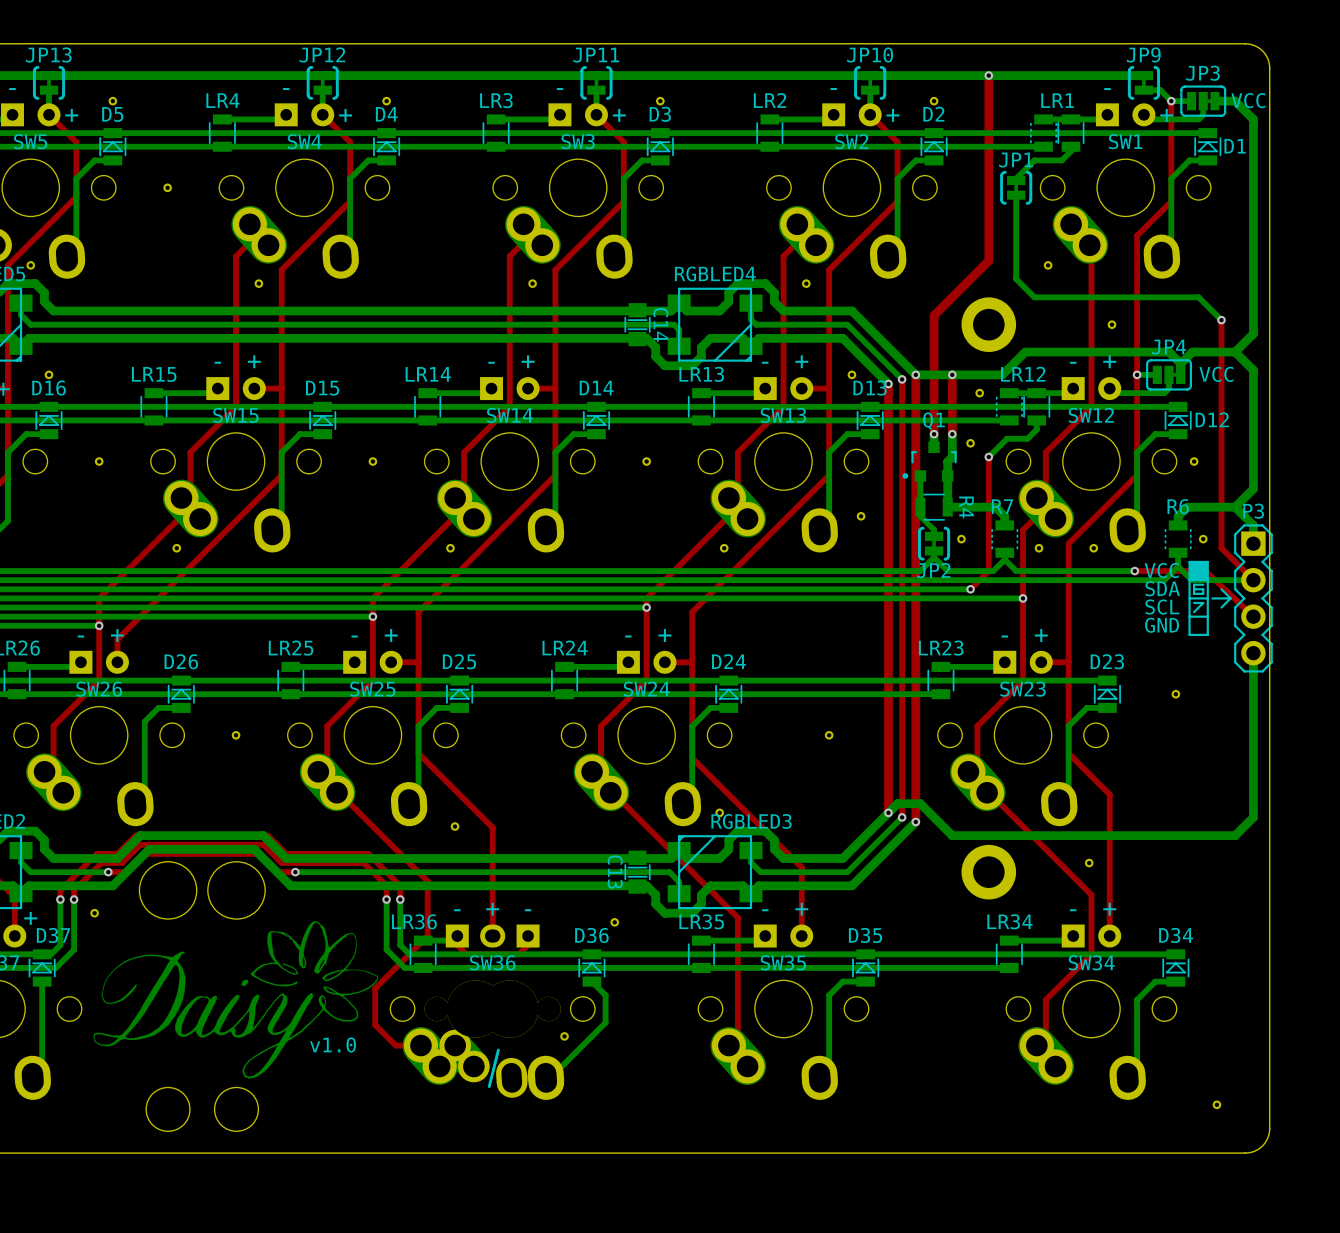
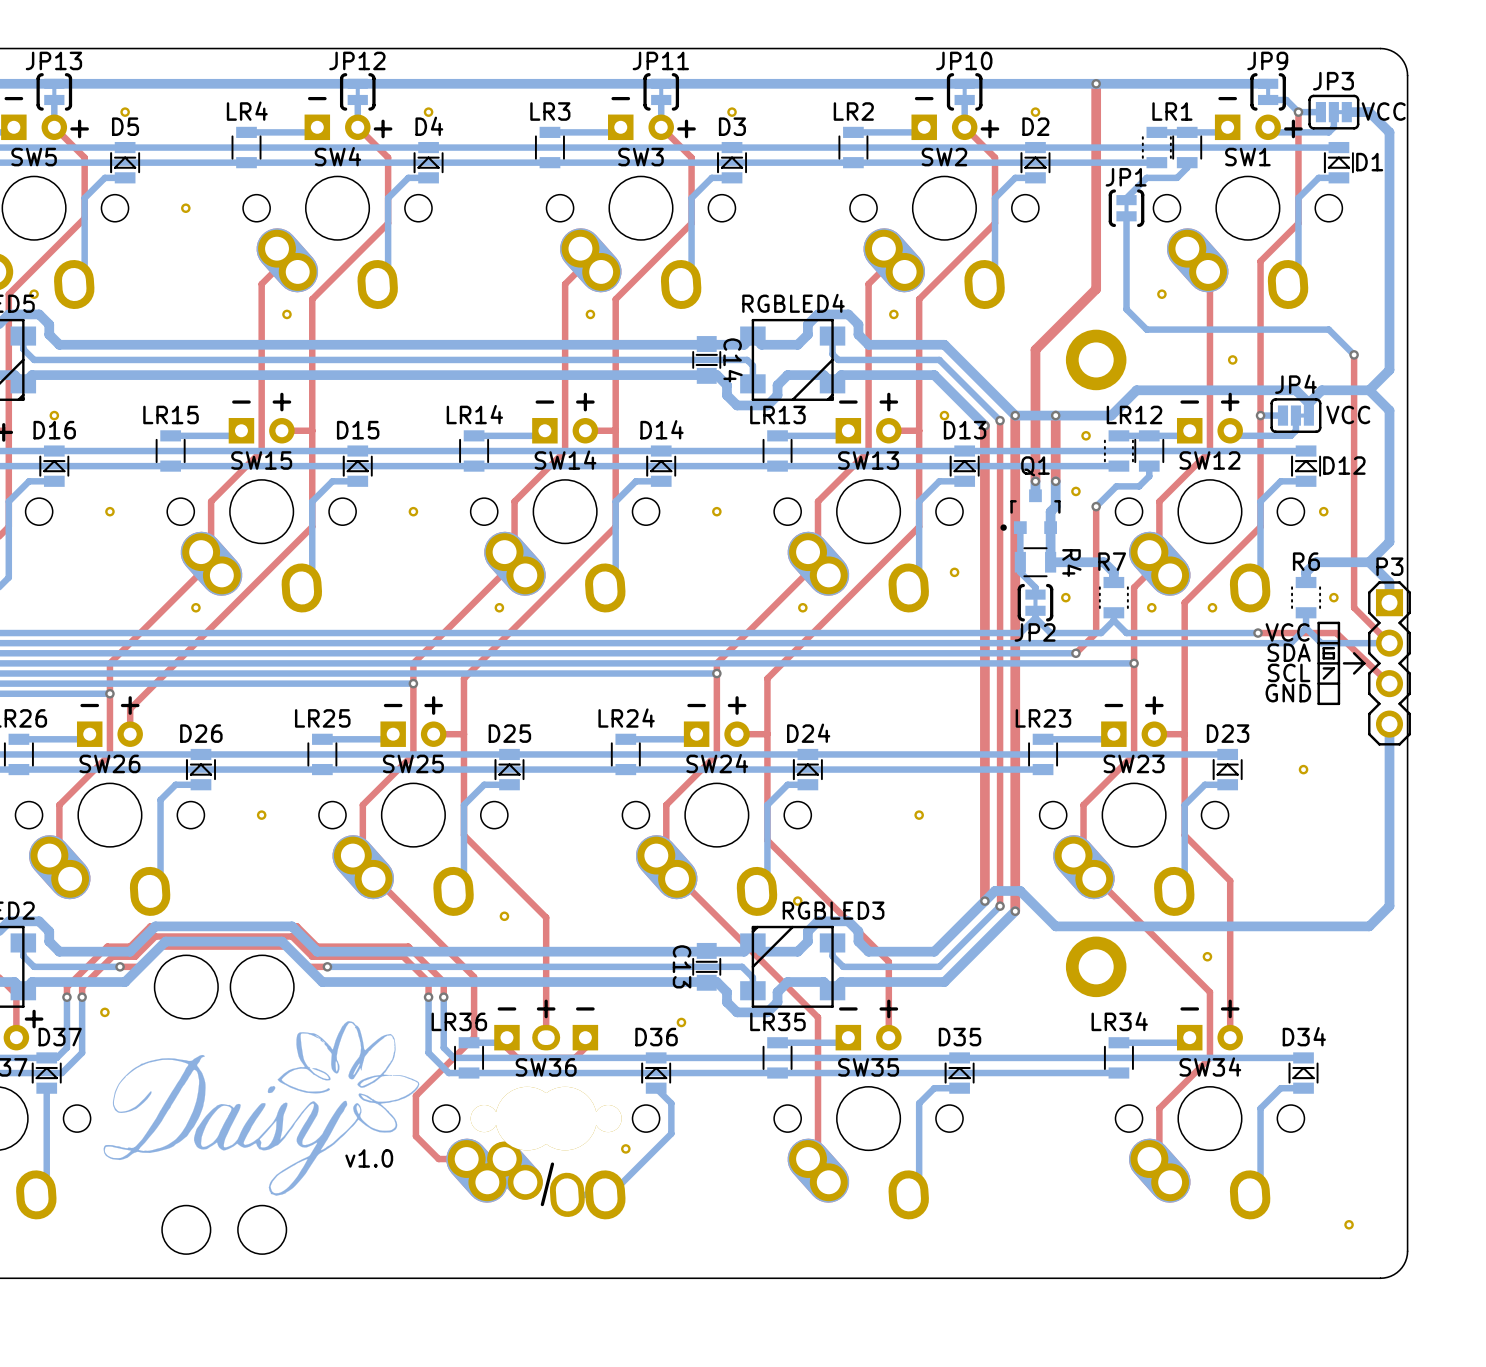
drawing: [1189, 561, 1208, 581] -> none

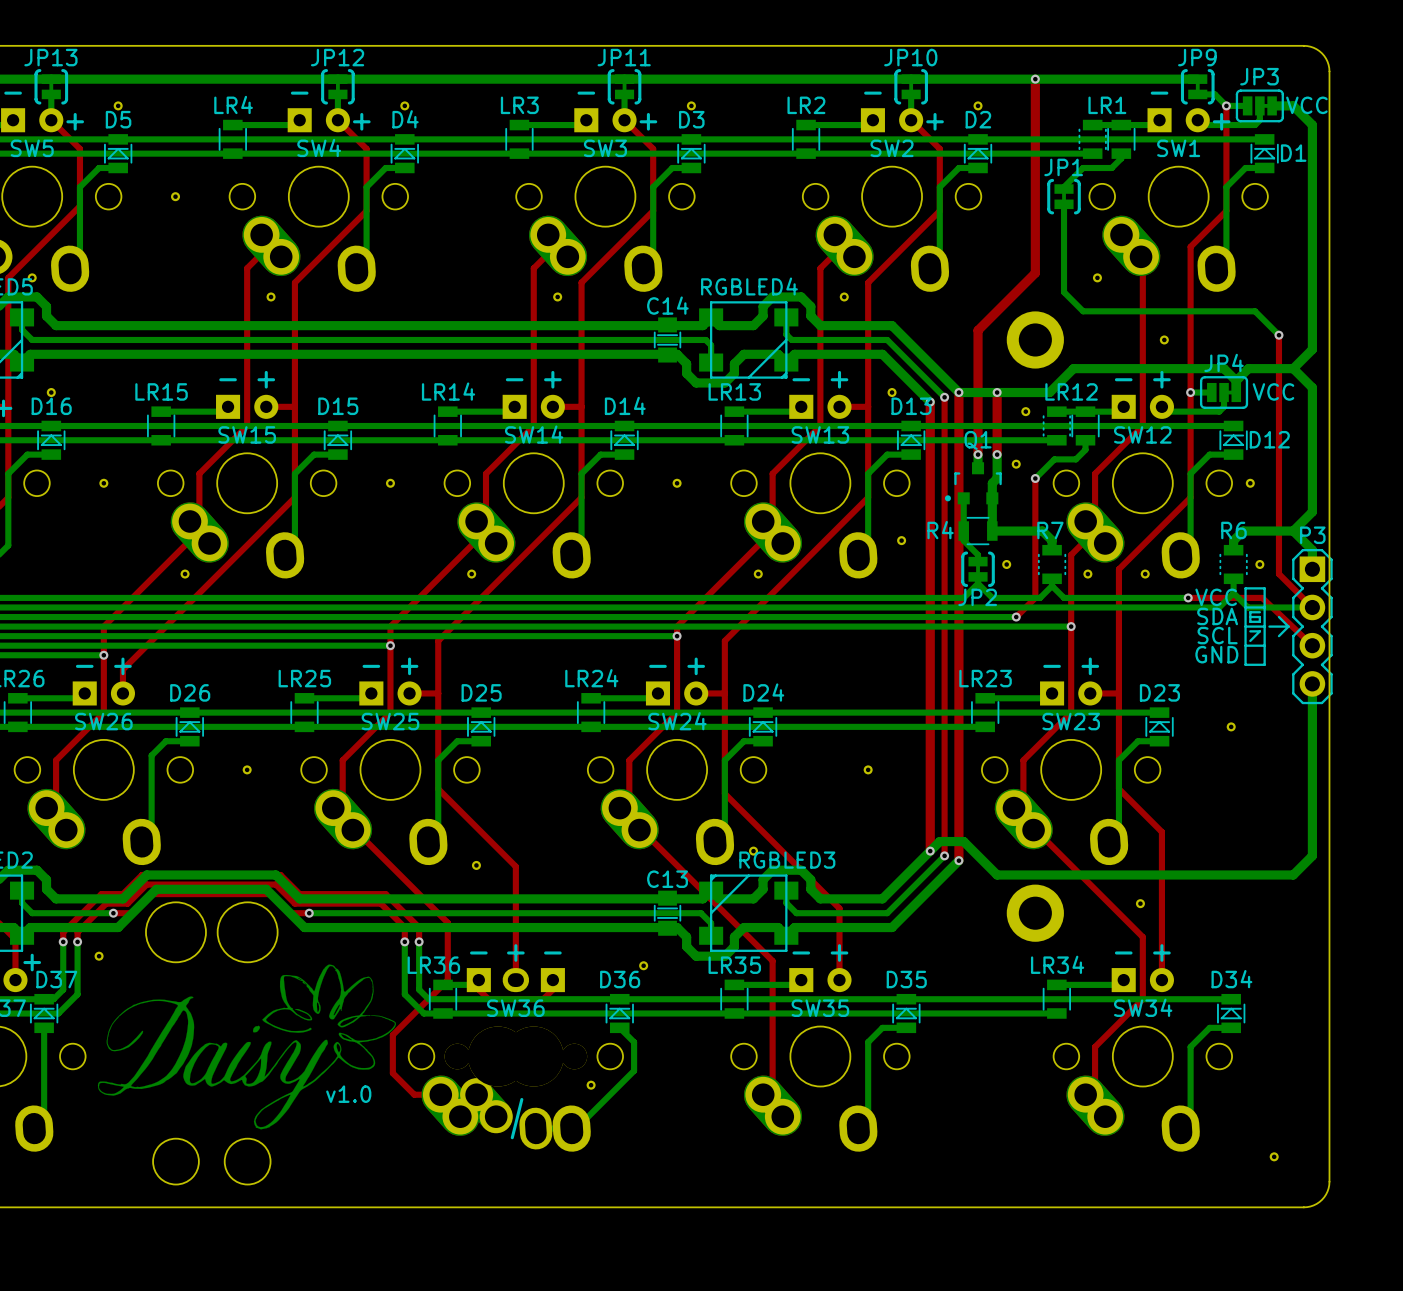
C14 name rotation: 0° (733, 360) -> 90° counterclockwise (667, 305)
R4 name rotation: 0° (1071, 563) -> 90° counterclockwise (940, 530)
R4 name position: R4 (1071, 563) -> R4 (940, 530)
C13 name rotation: 0° (682, 966) -> 90° counterclockwise (667, 879)

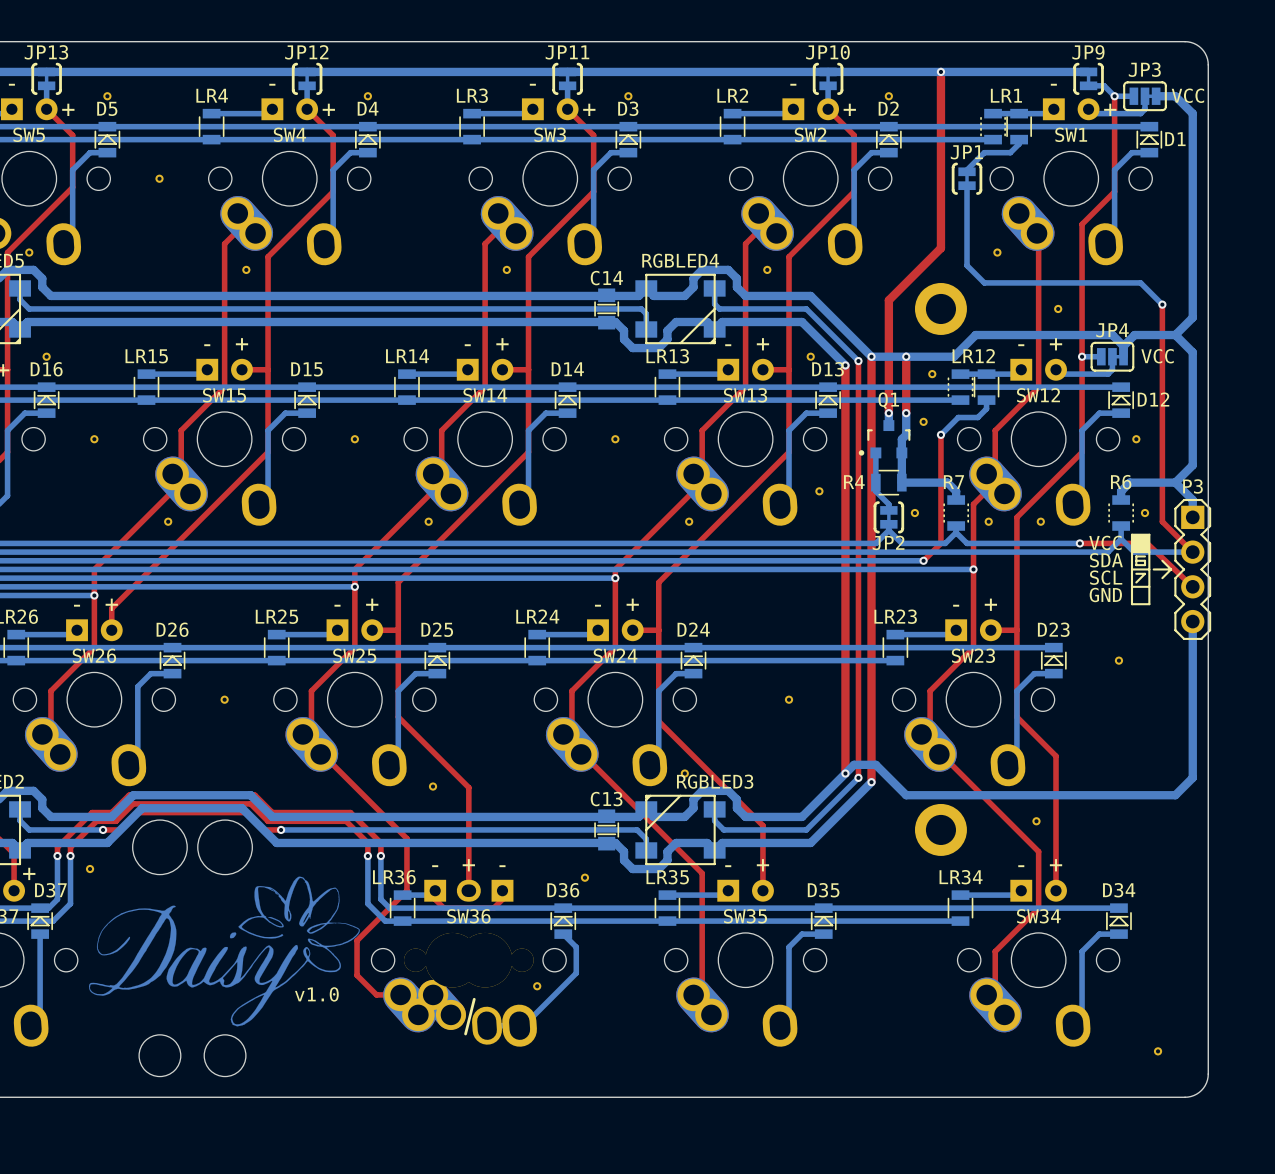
drawing: none -> [1131, 534, 1150, 553]

